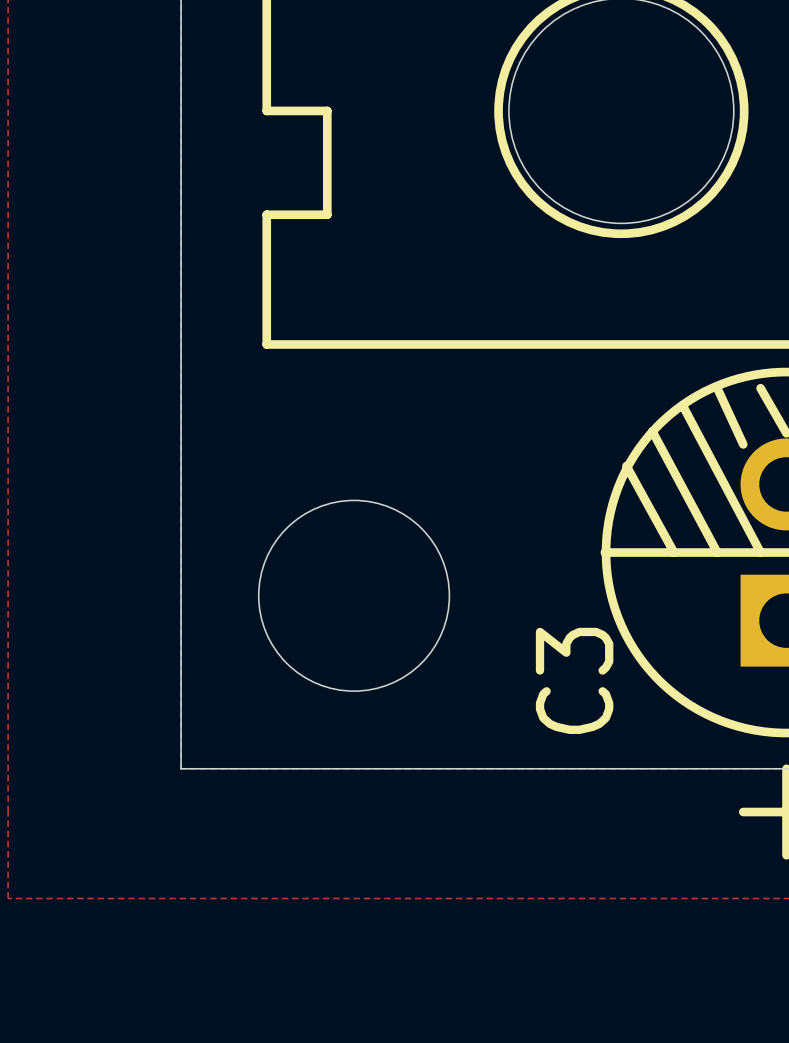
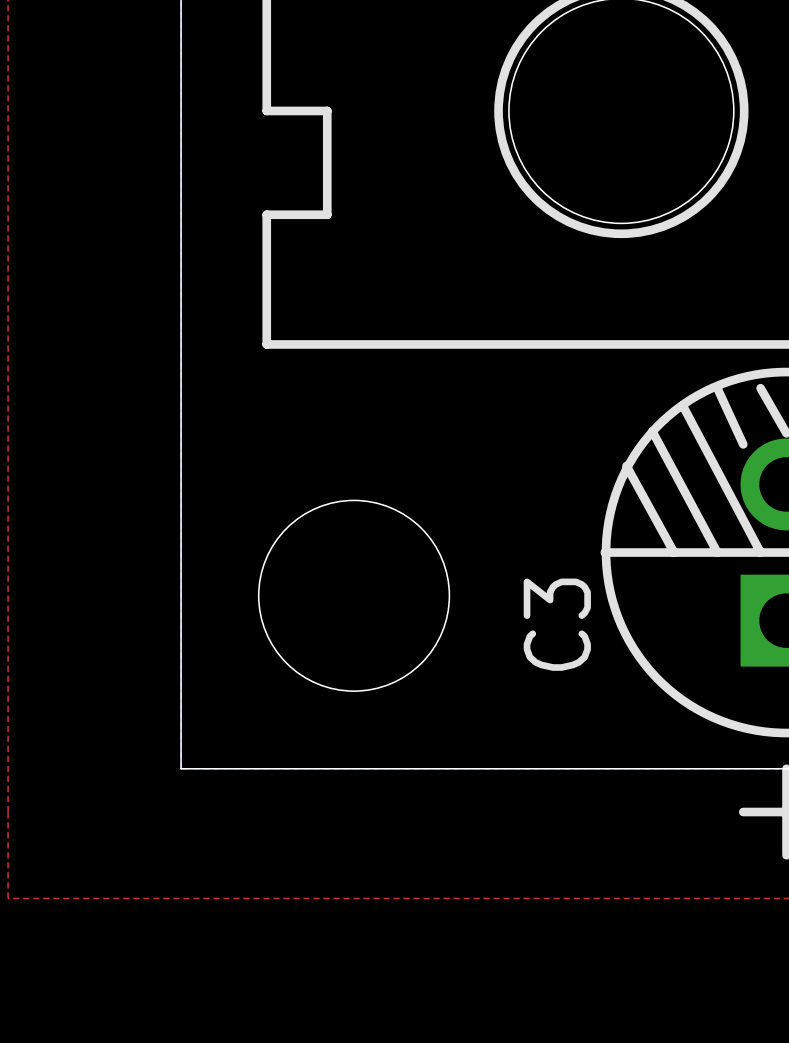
C3 name position: C3 (574, 680) -> C3 (557, 624)

